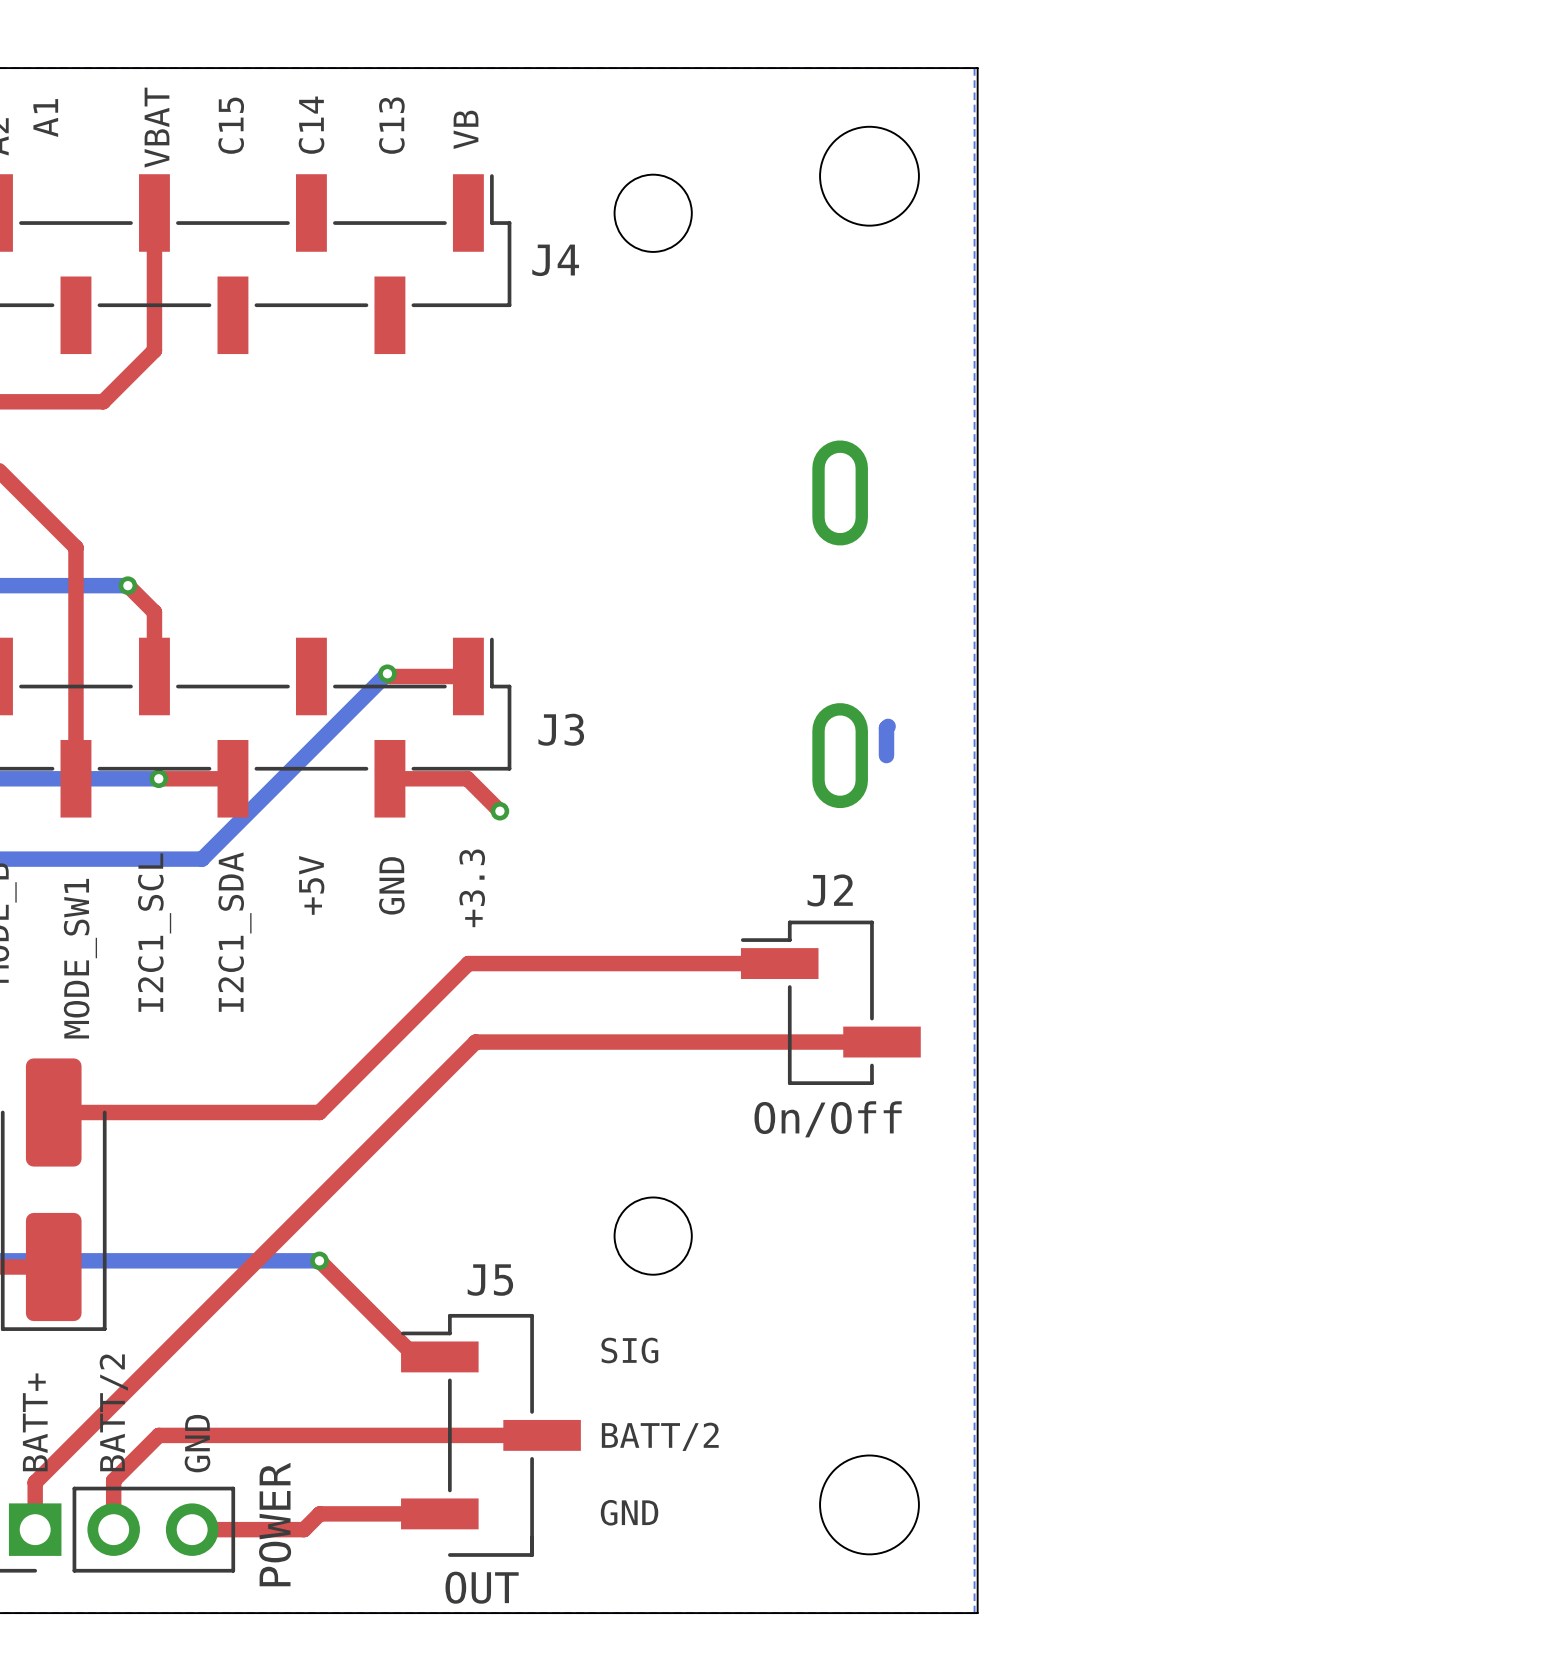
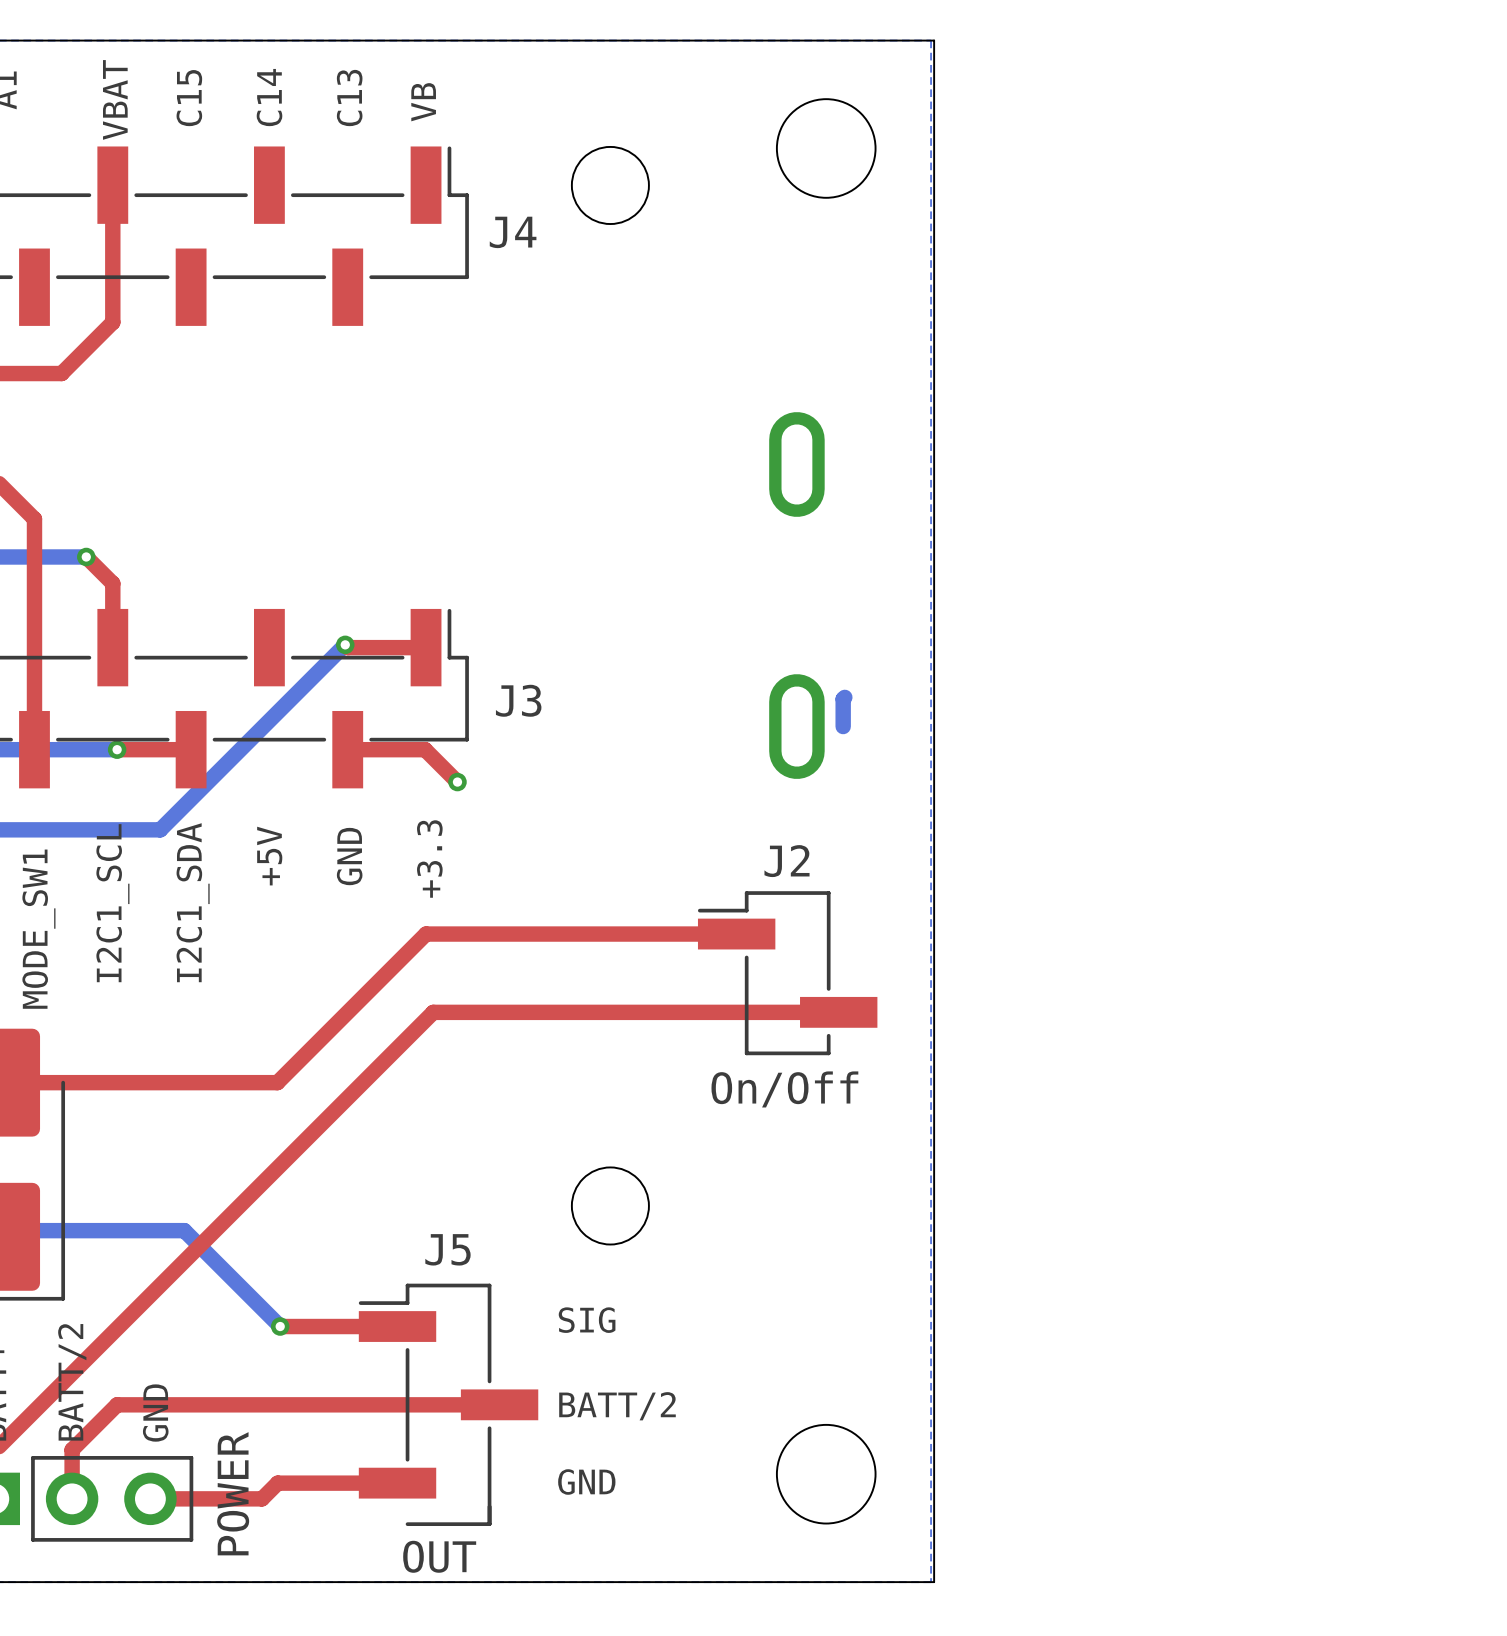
bottom track: (226, 1260) (319, 1260) -> (184, 1230) (280, 1326)
top track: (319, 1260) (415, 1356) -> (280, 1326) (373, 1326)
via position: (319, 1260) -> (280, 1326)

